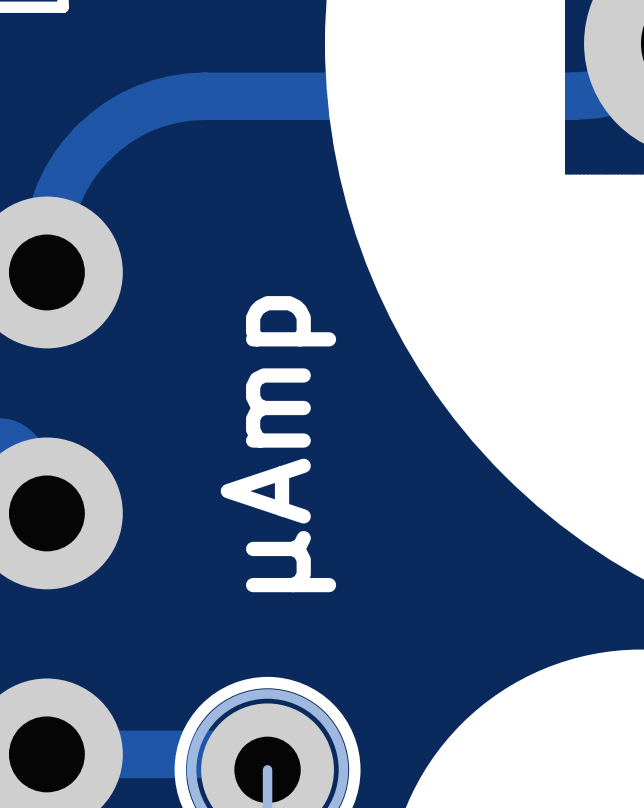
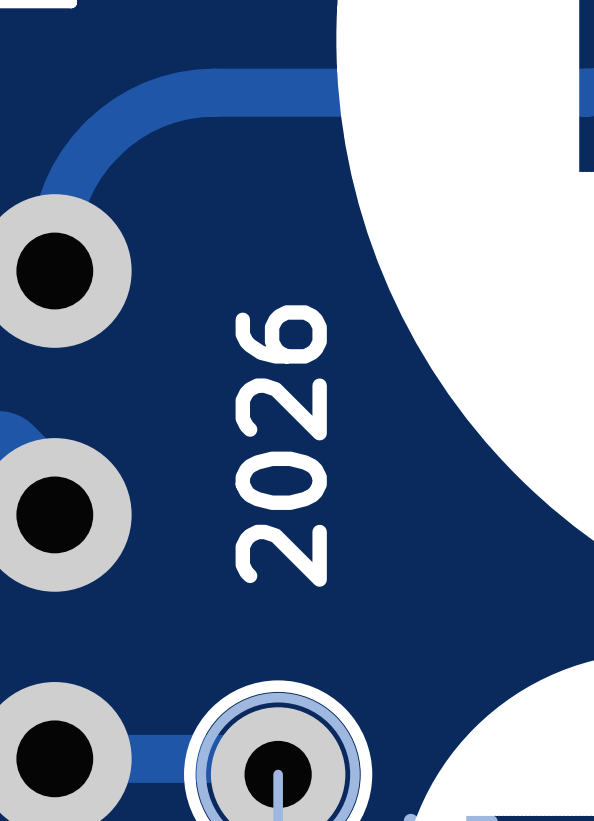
text: µAmp (278, 444) -> 2026 (281, 446)

